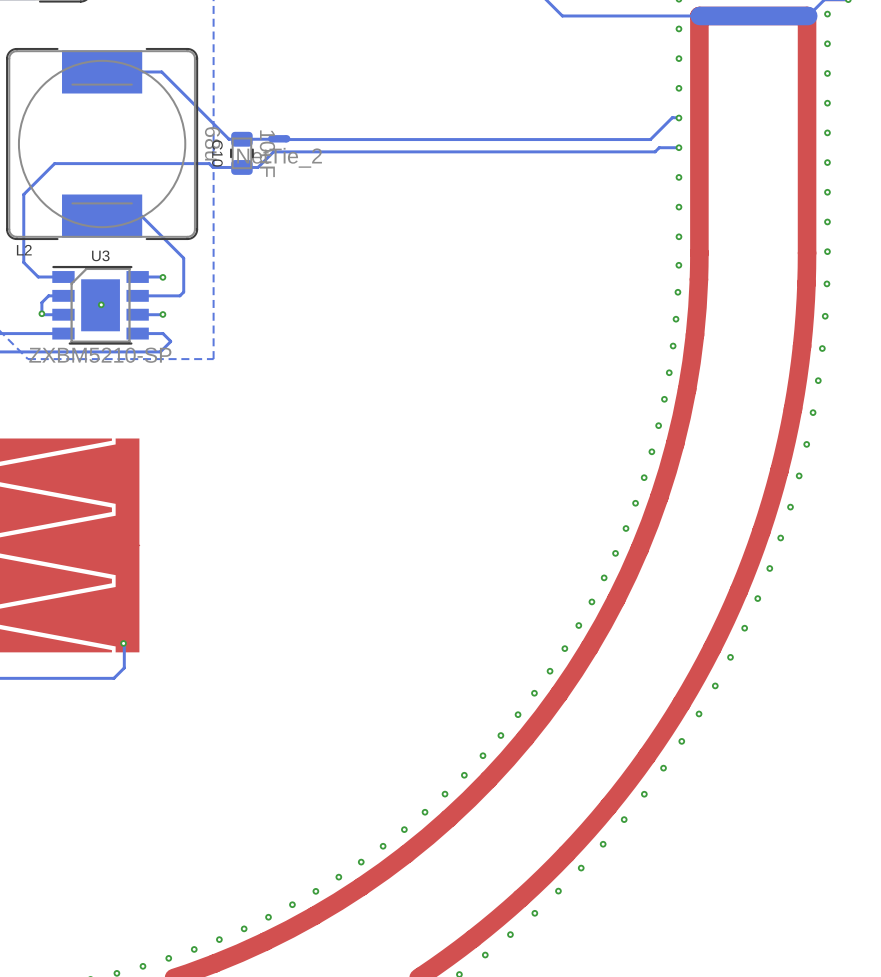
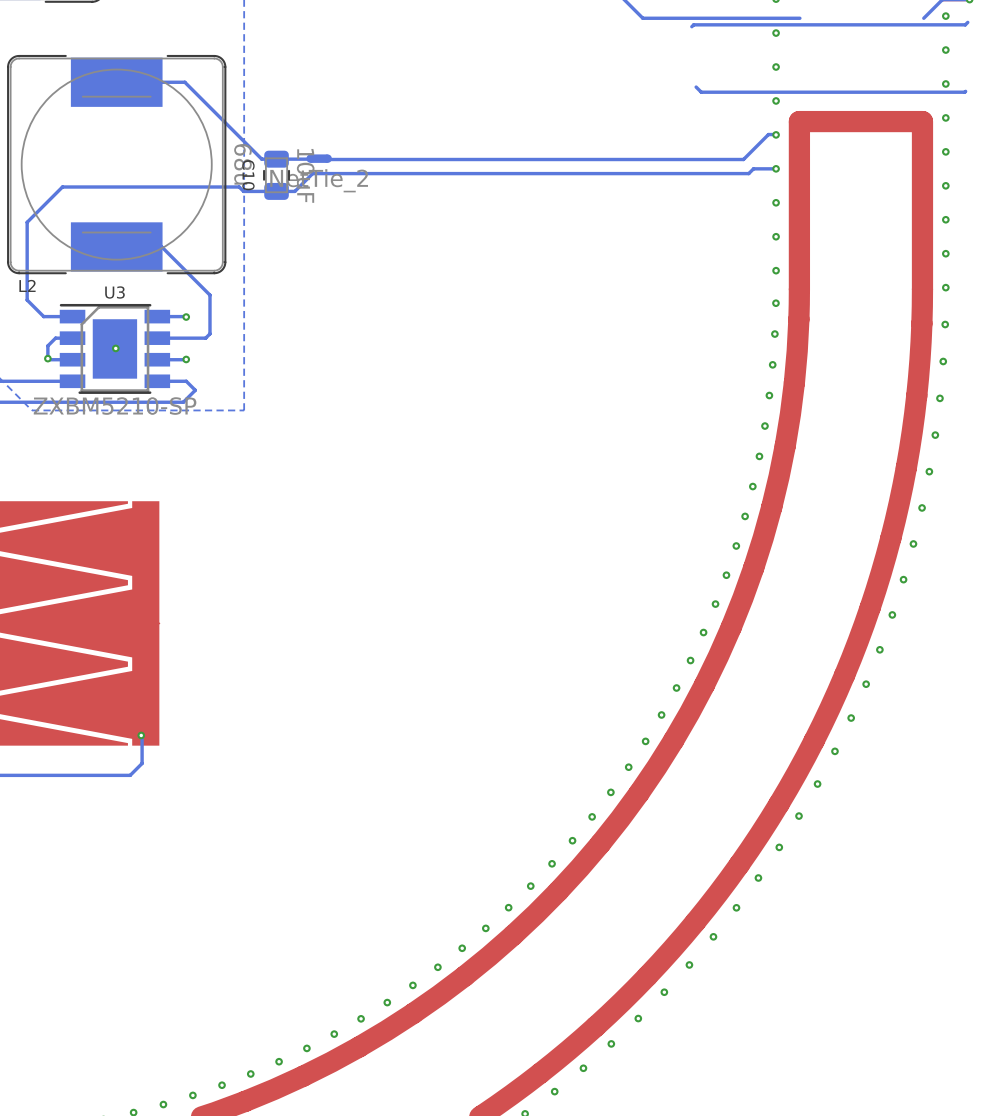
bottom track: (808, 15) (699, 15) -> none
bottom track: none -> (967, 22) (965, 24) (693, 24) (691, 26)
bottom track: none -> (696, 87) (701, 92) (965, 91)
top track: (807, 106) (807, 15) (699, 15) (699, 106) -> (922, 121) (799, 121)

